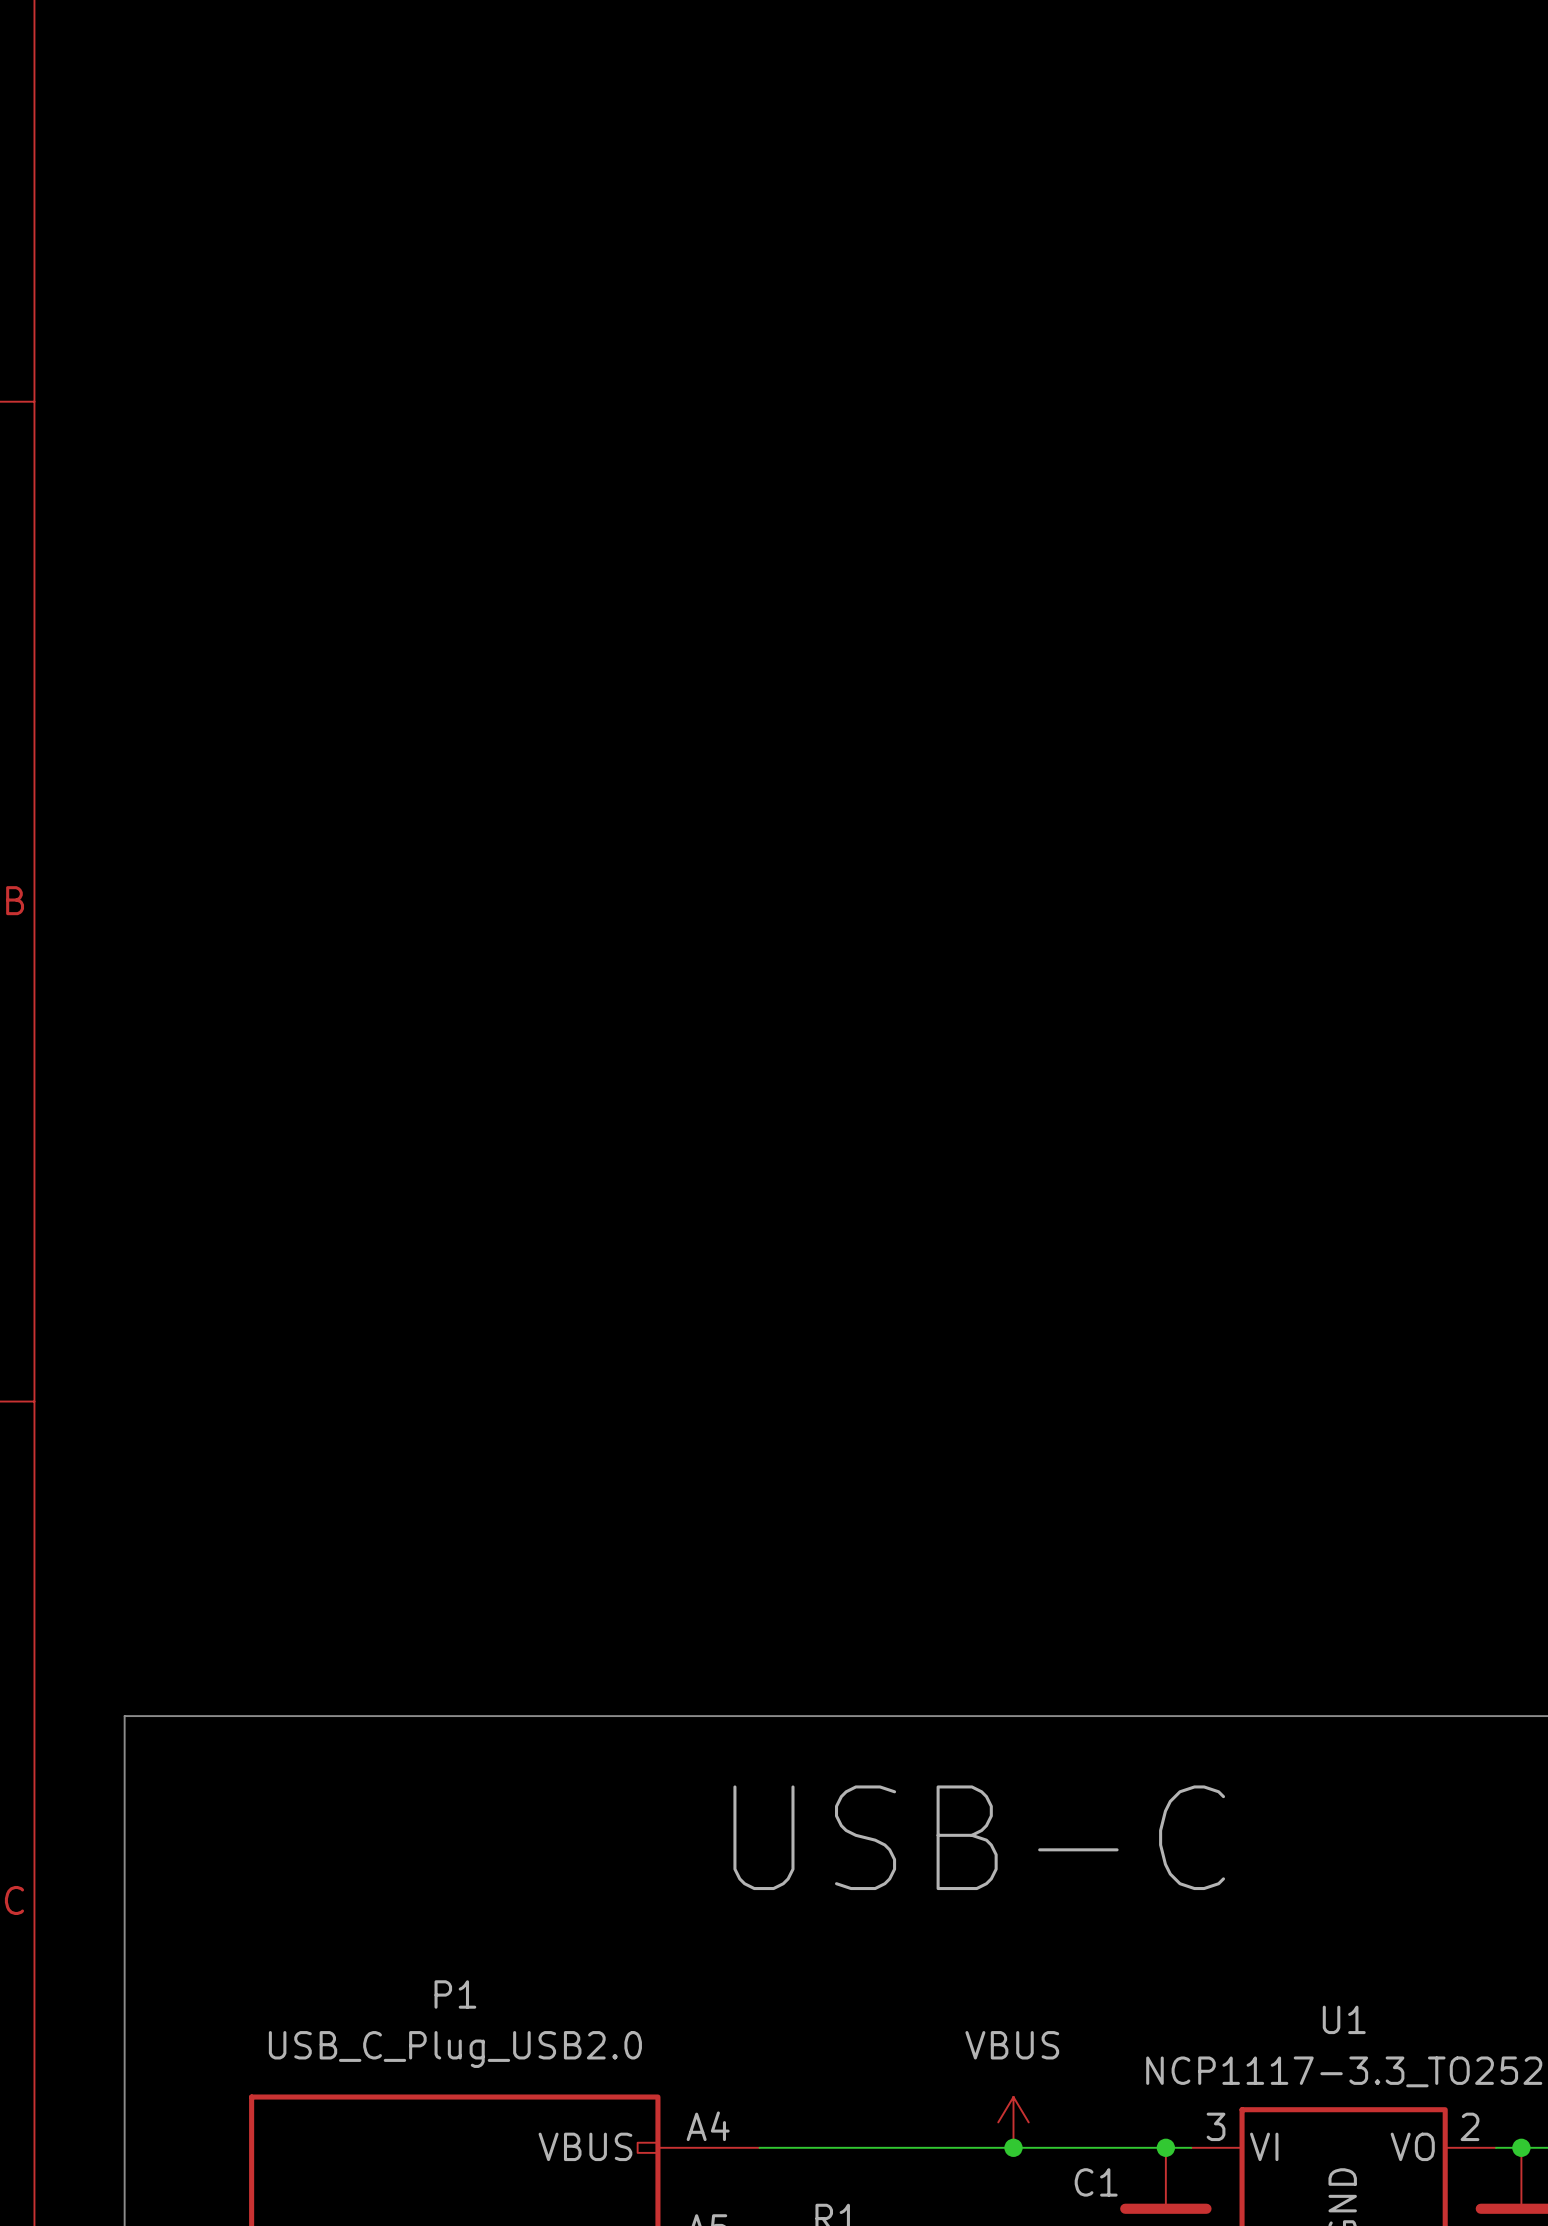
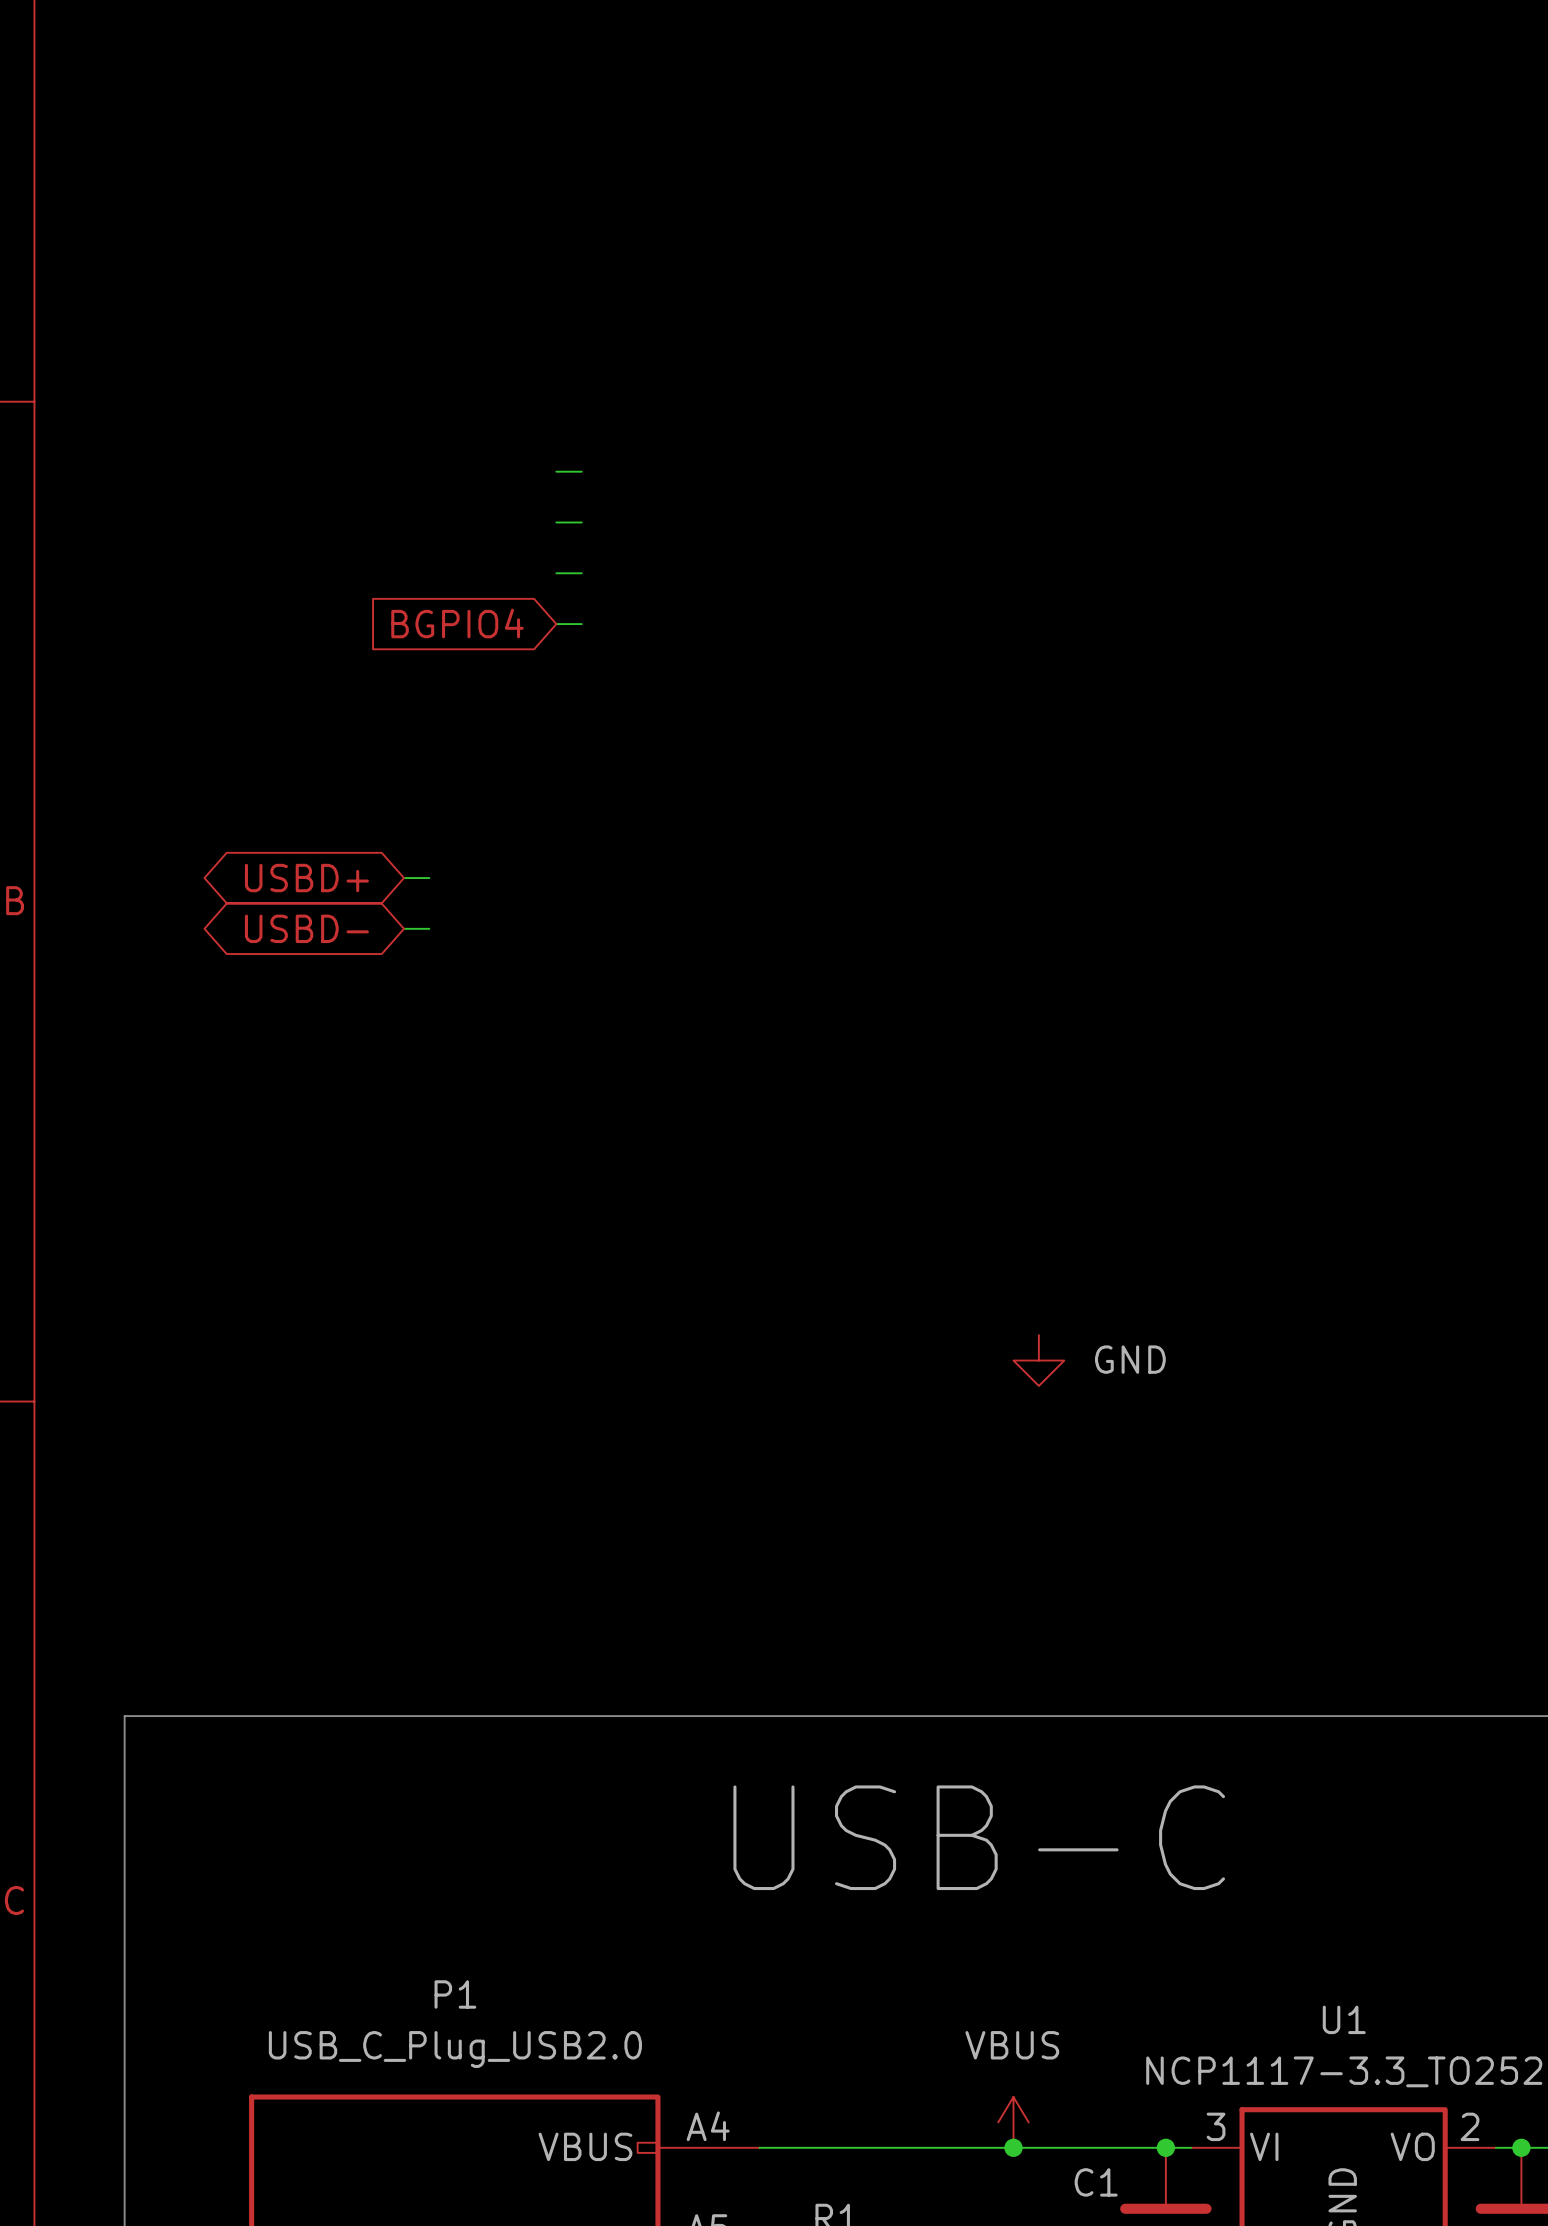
wire: none -> (556, 471) (581, 471)
wire: none -> (556, 522) (581, 522)
wire: none -> (556, 573) (581, 573)
global label: none -> BGPIO4 (457, 623)
wire: none -> (556, 624) (581, 624)
global label: none -> USBD+ (306, 878)
wire: none -> (404, 878) (429, 878)
global label: none -> USBD- (306, 928)
wire: none -> (404, 928) (429, 928)
power symbol: none -> GND (1038, 1360)

